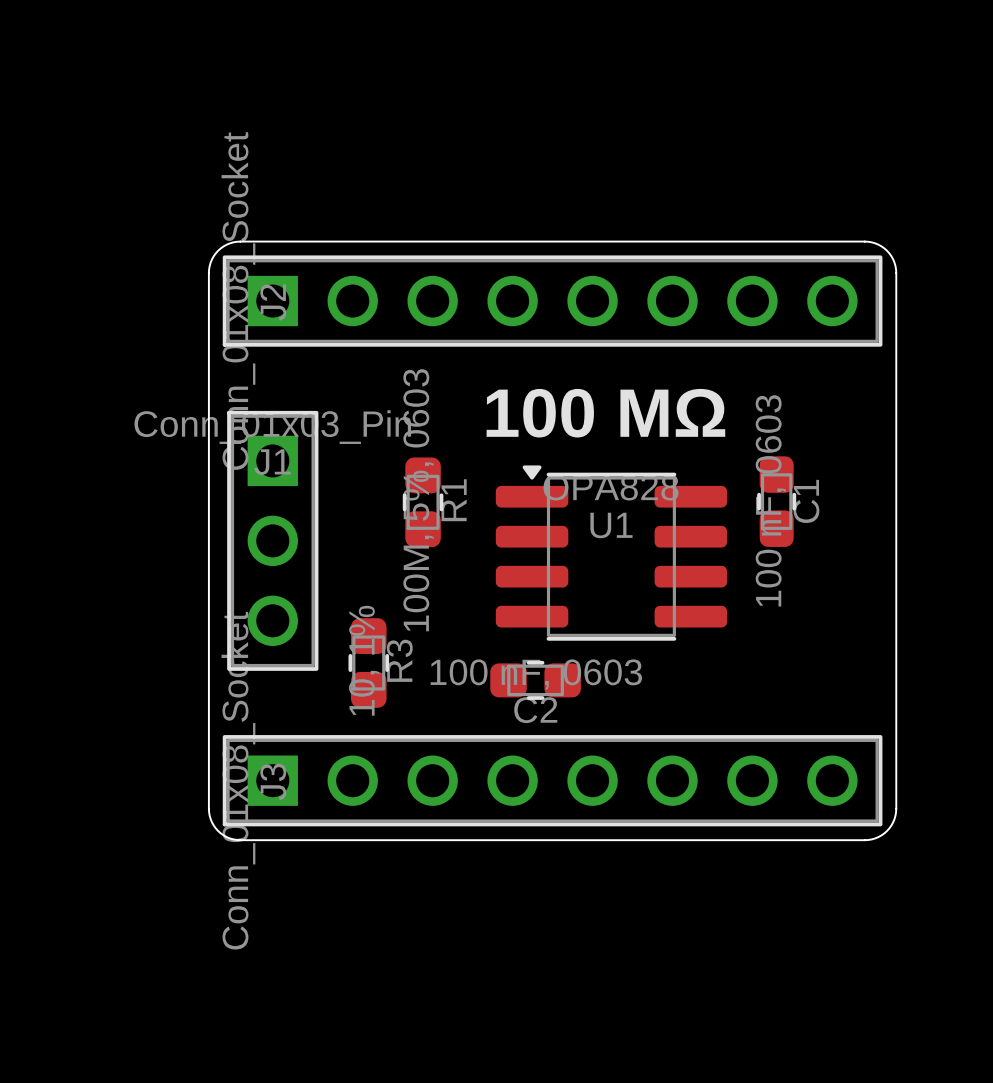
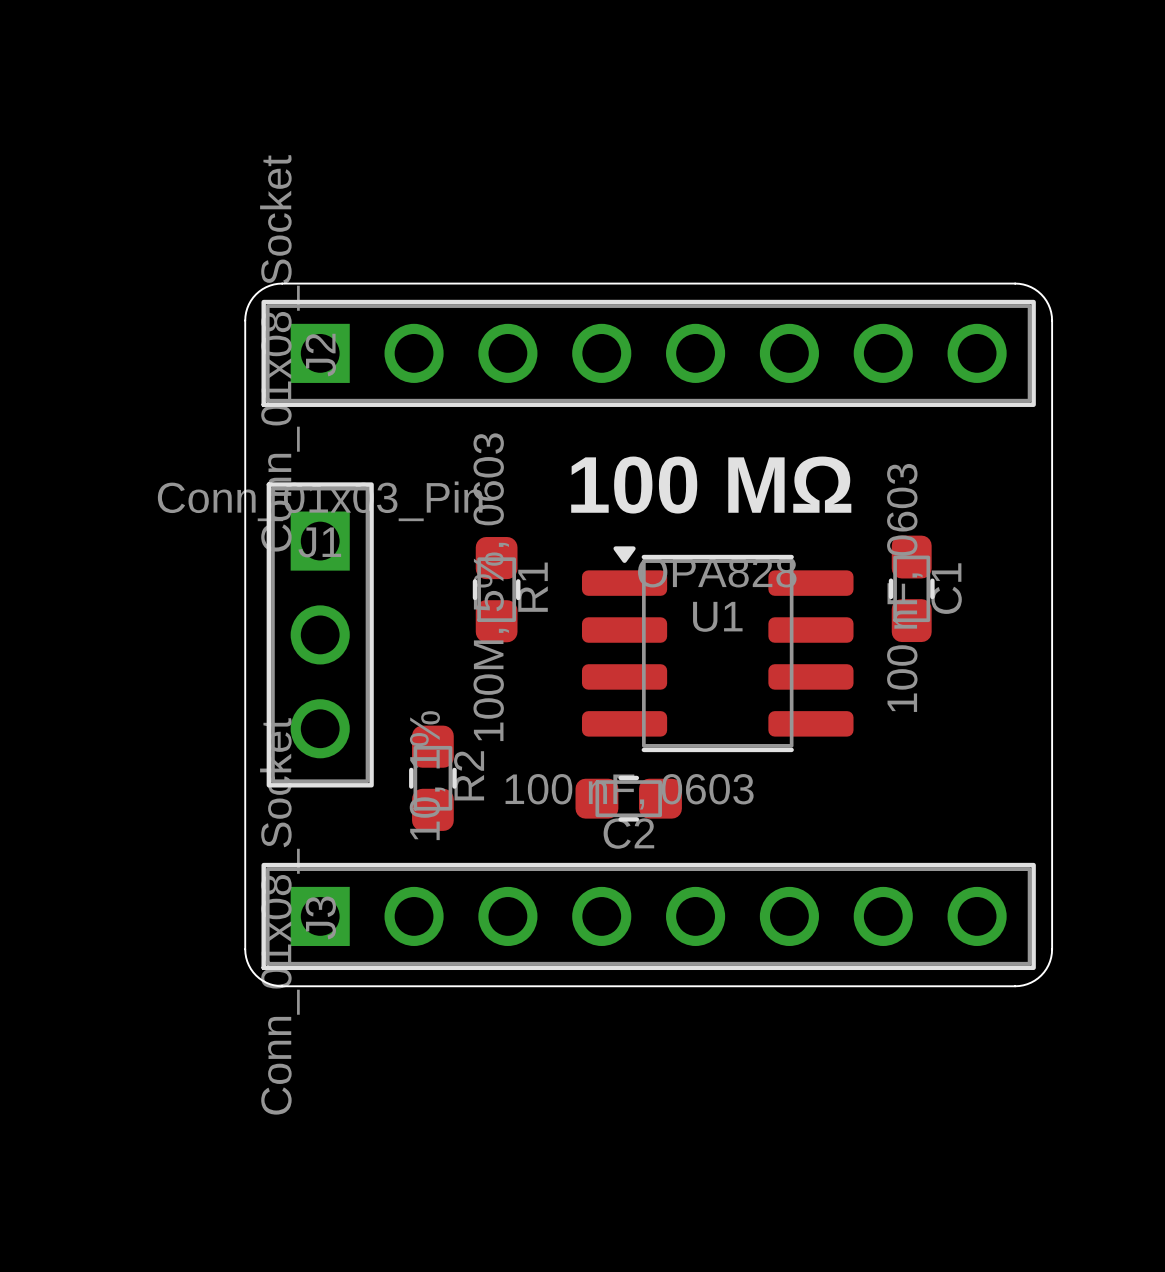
R3 name: R3 (399, 660) -> R2 (469, 775)

